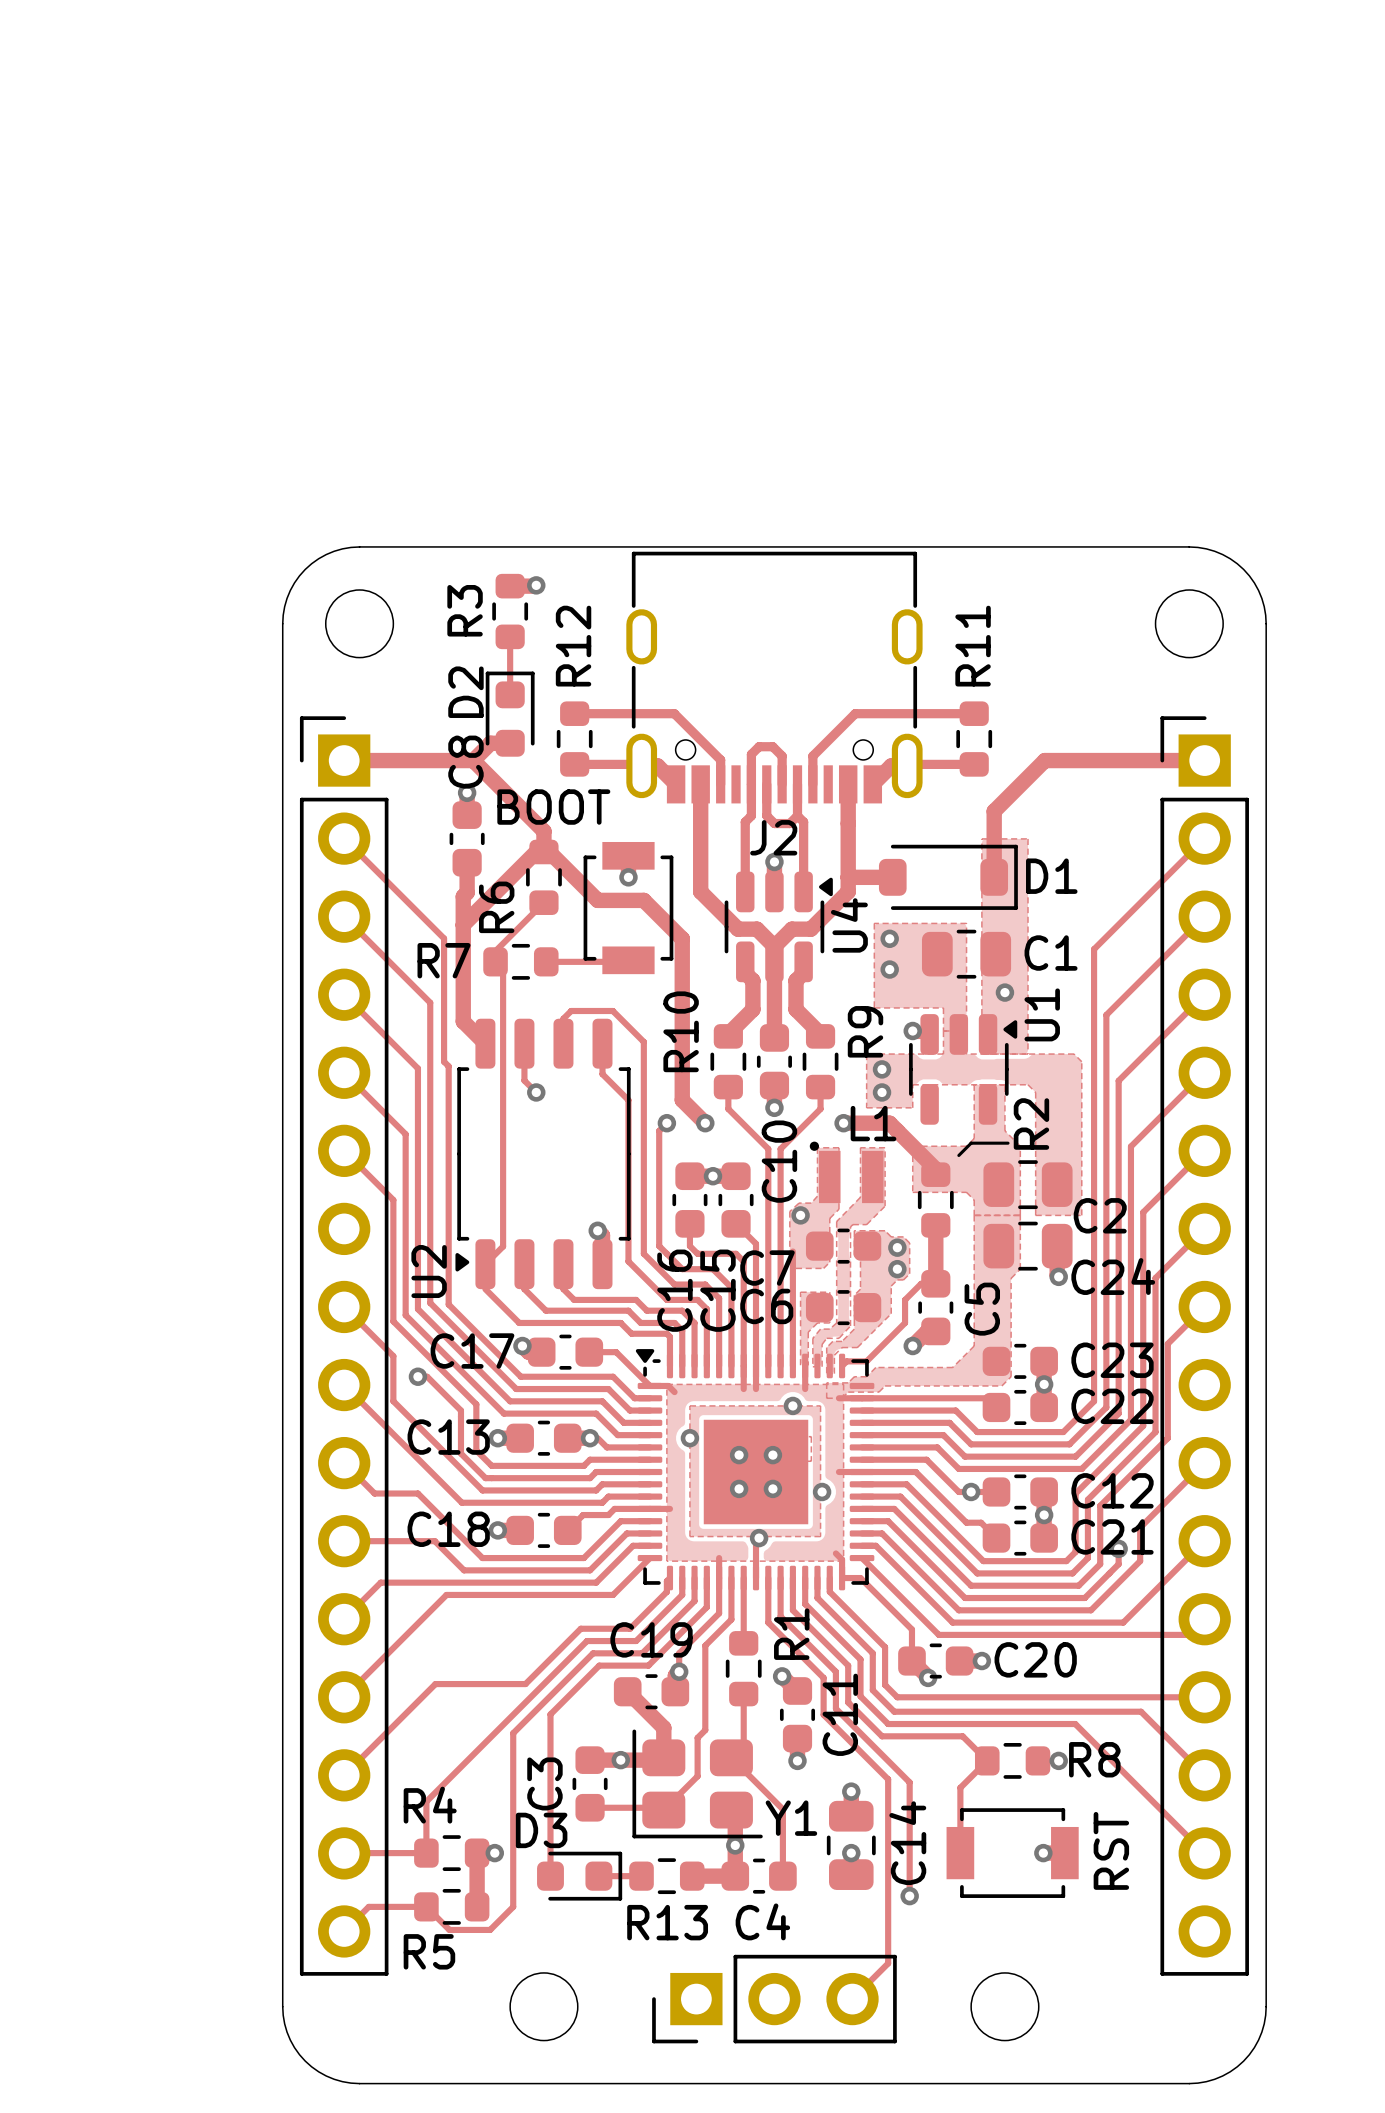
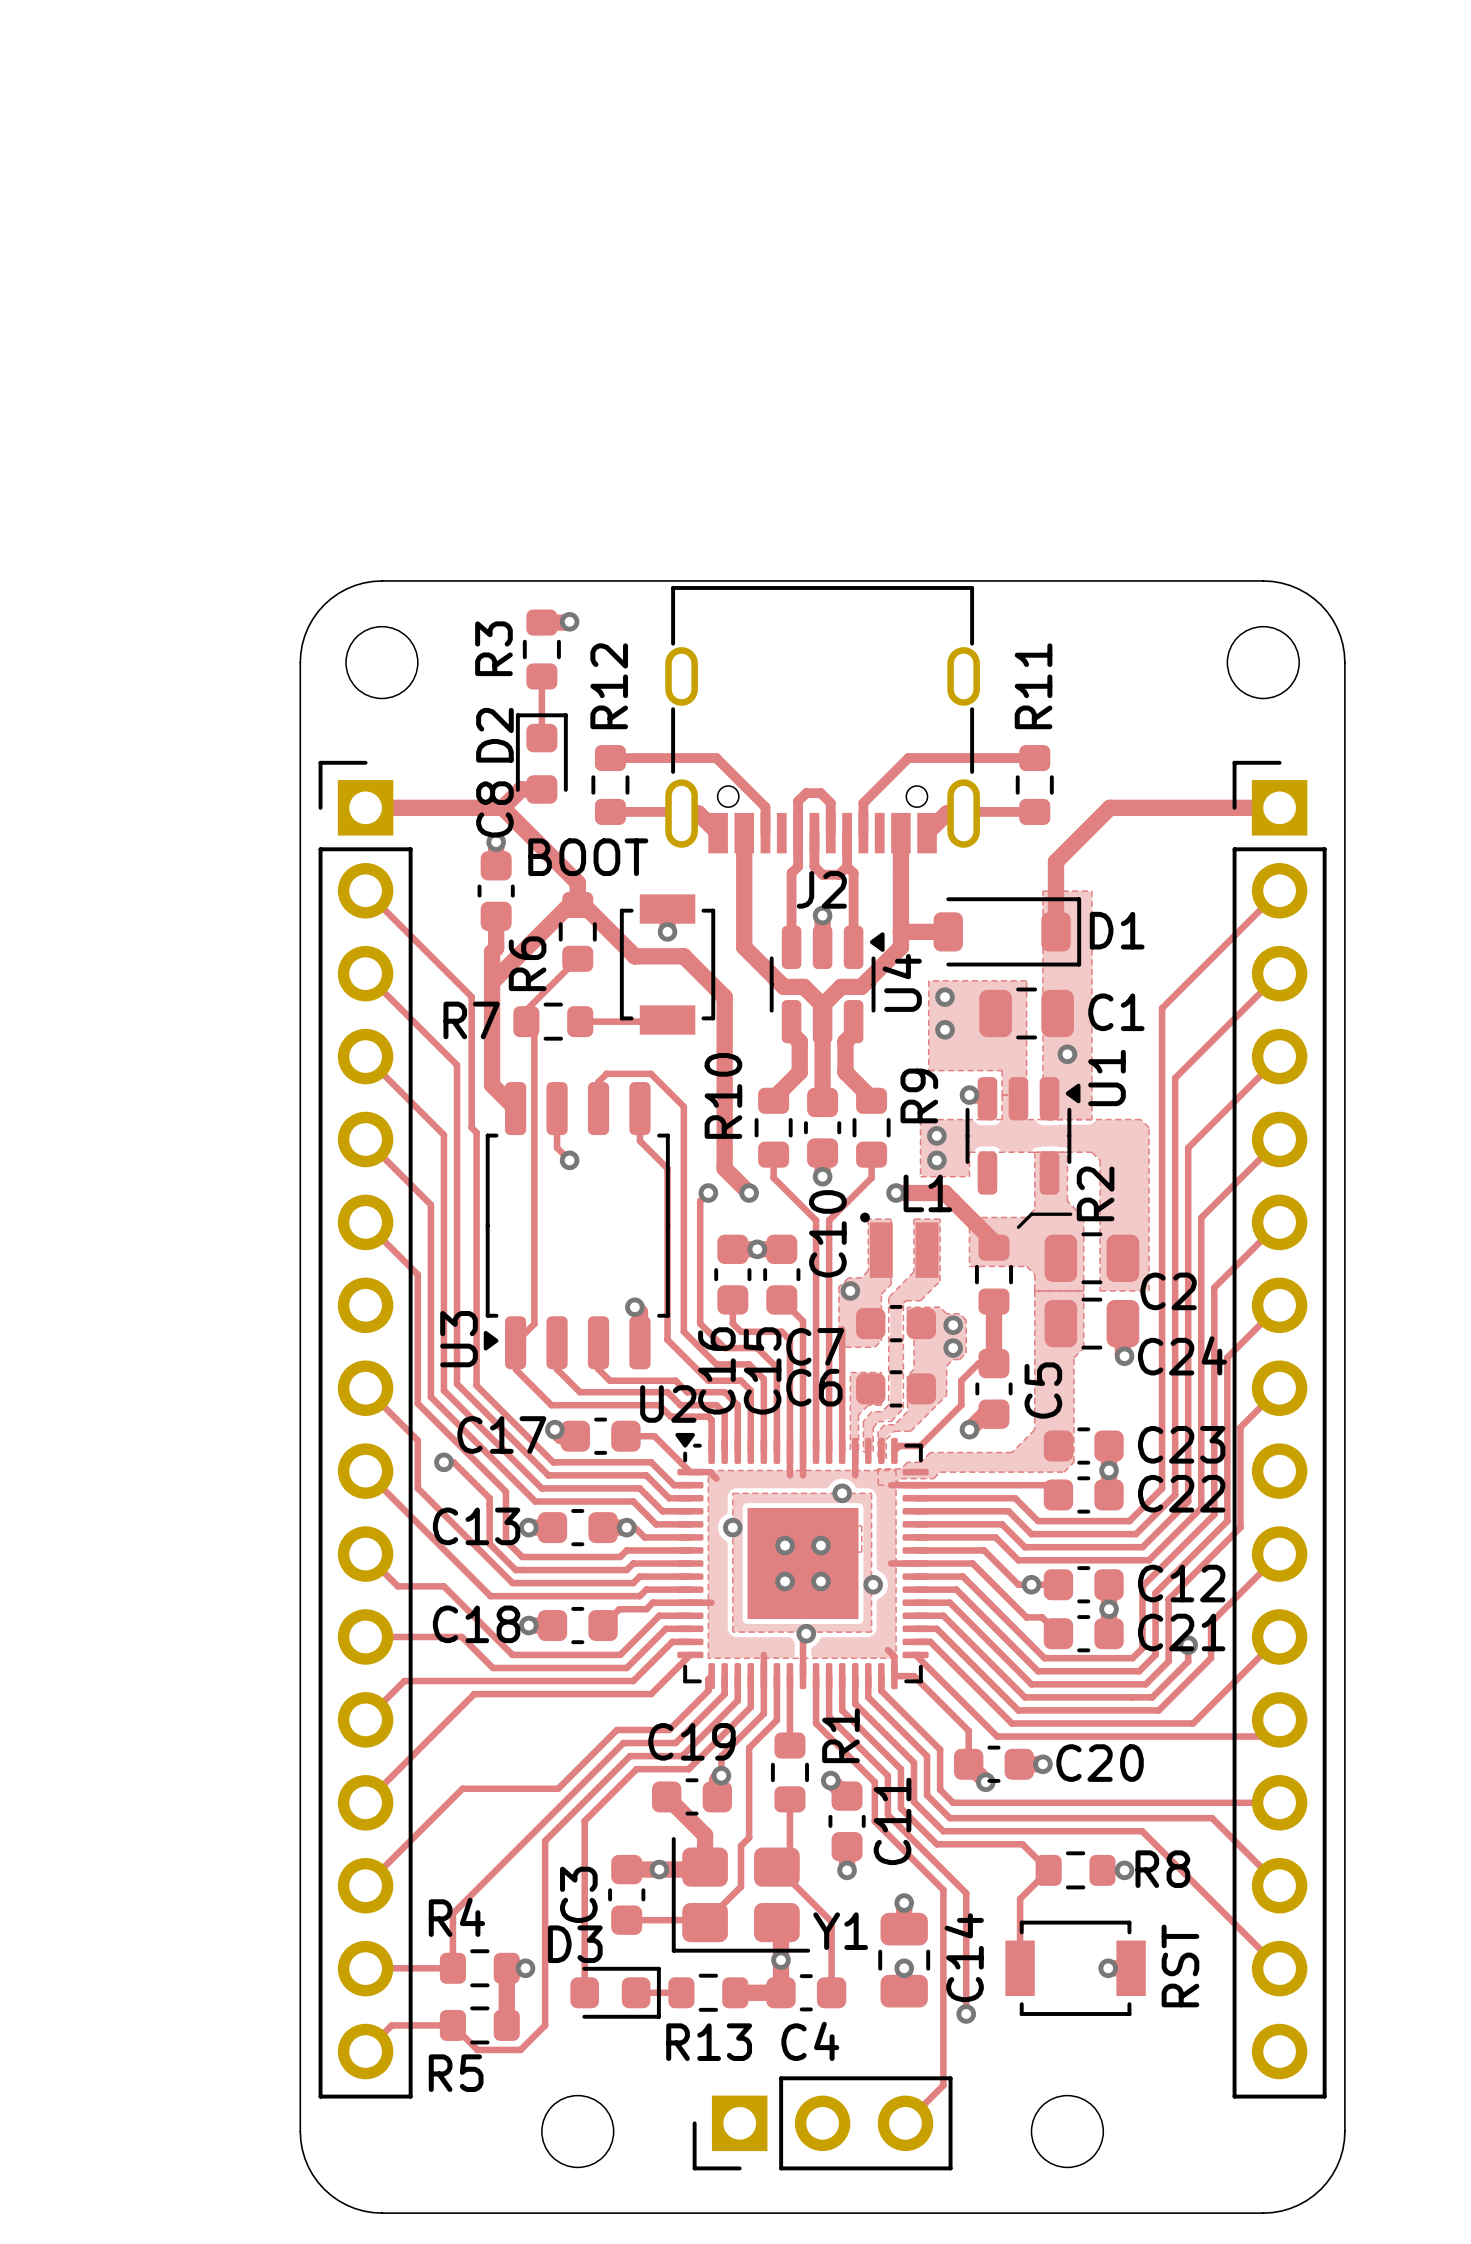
U3 name: none -> U3 (459, 1339)
U2 name rotation: 0° (429, 1271) -> 90° clockwise (668, 1403)
U2 name position: U2 (429, 1271) -> U2 (668, 1403)

